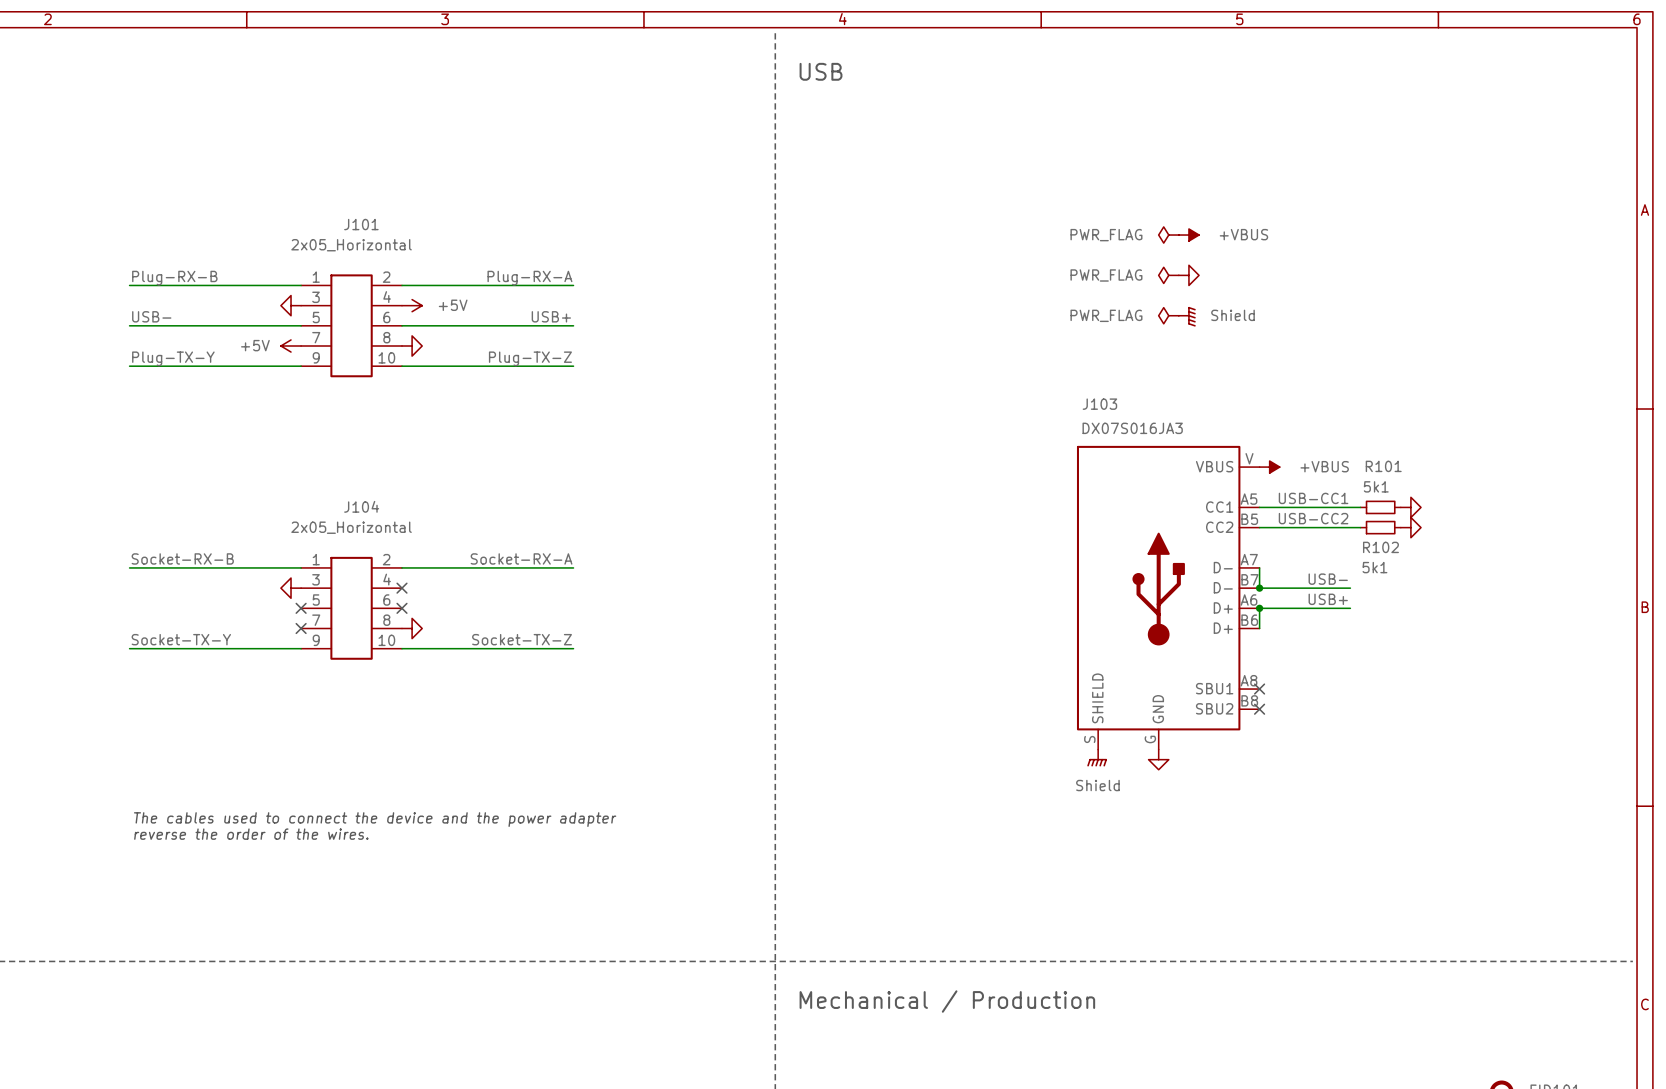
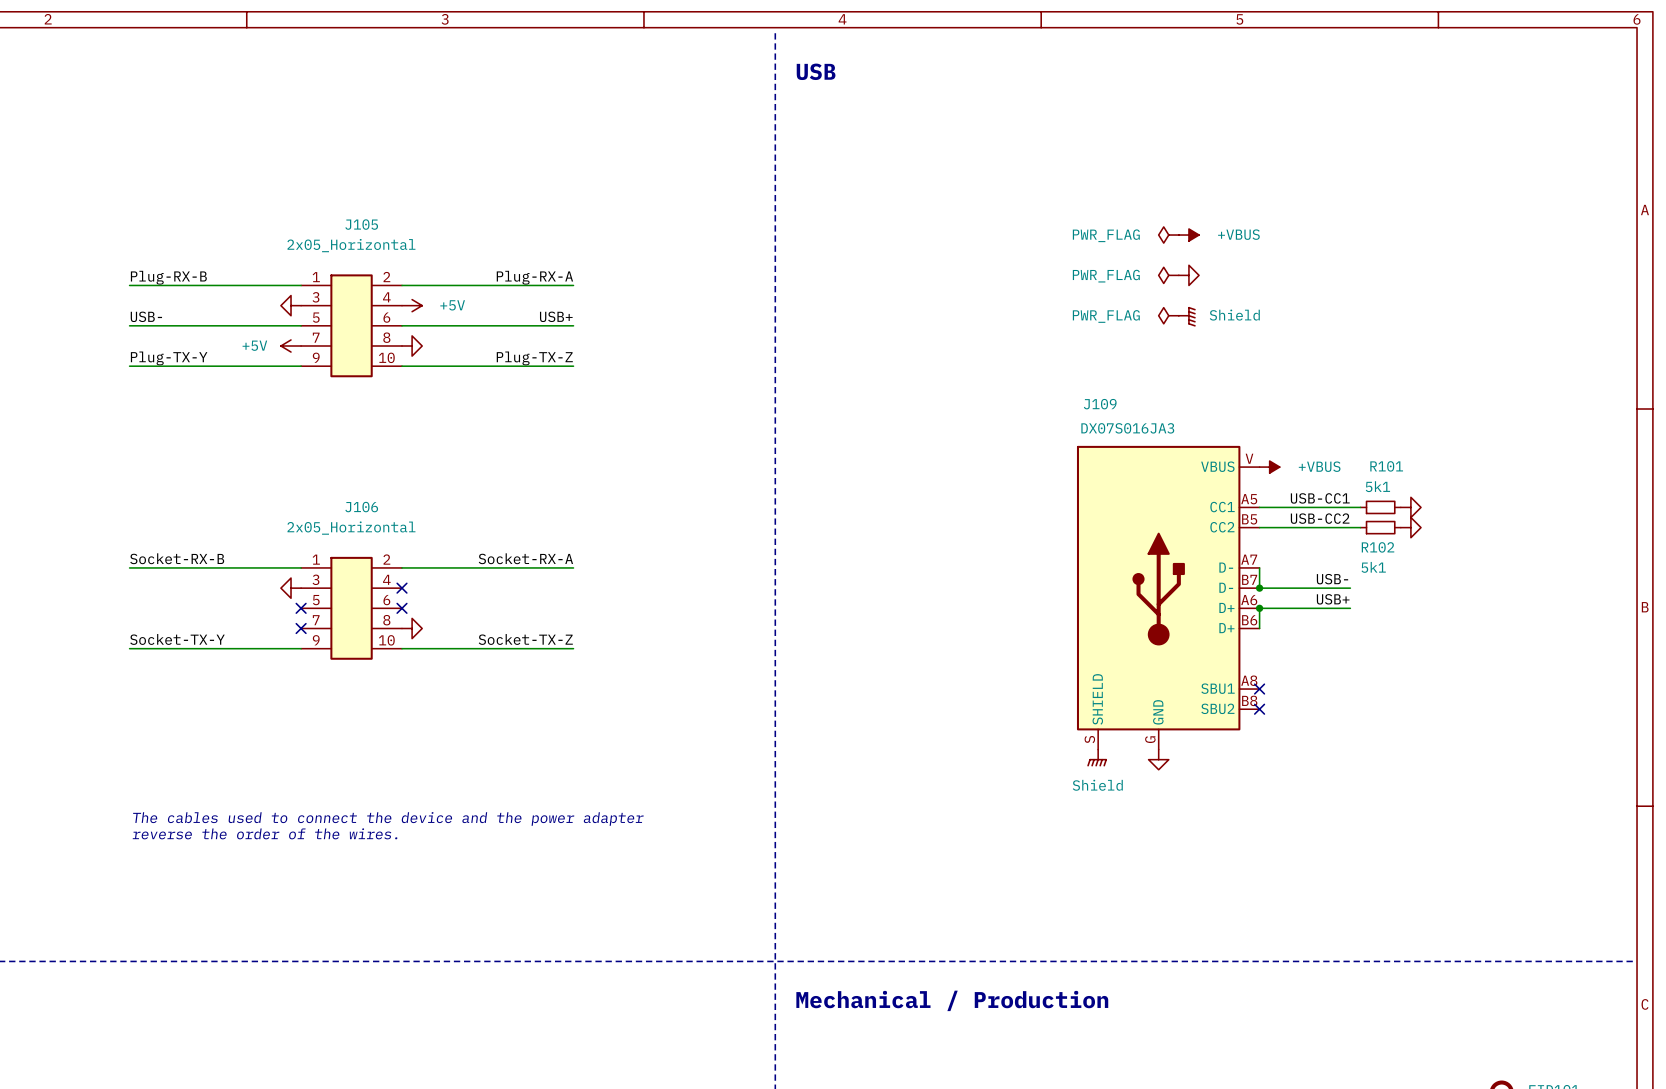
J101 name: J101 (361, 224) -> J105 (361, 224)
J103 name: J103 (1099, 404) -> J109 (1100, 404)
J104 name: J104 (361, 506) -> J106 (361, 507)

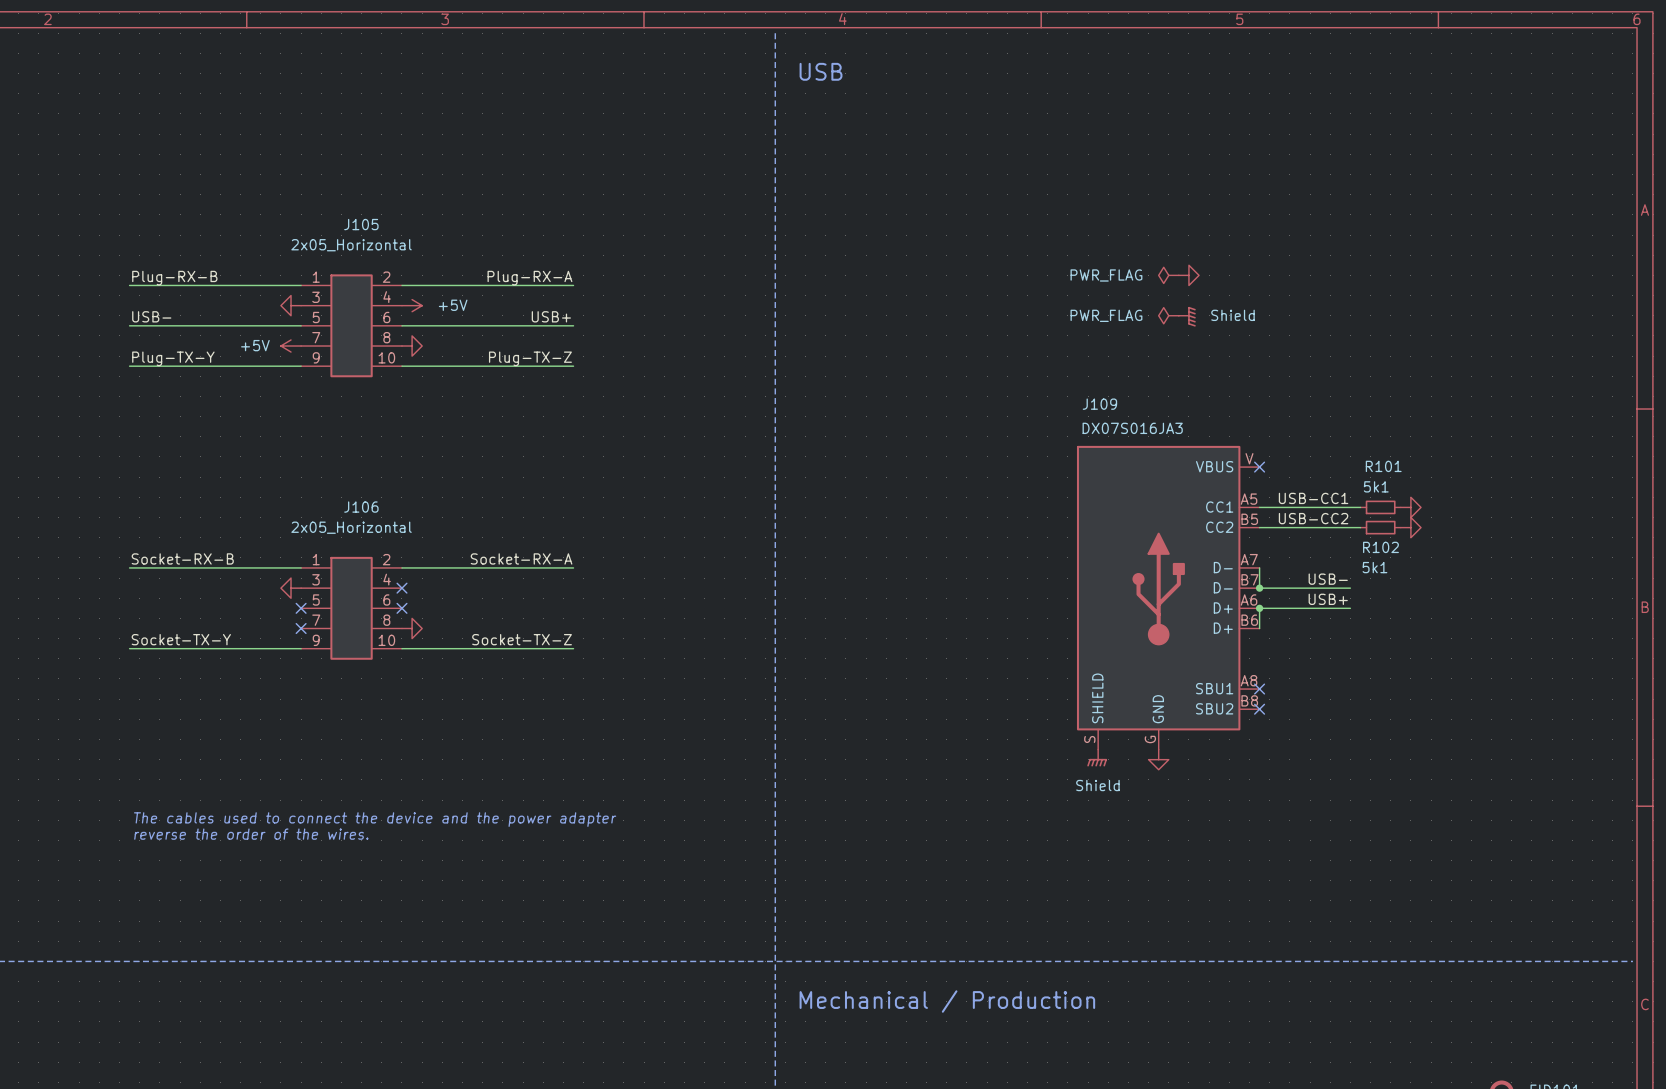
power symbol: PWR_FLAG (1168, 235) -> none
power symbol: +VBUS (1188, 235) -> none
no-connect mark: none -> (1259, 467)
power symbol: +VBUS (1269, 467) -> none

